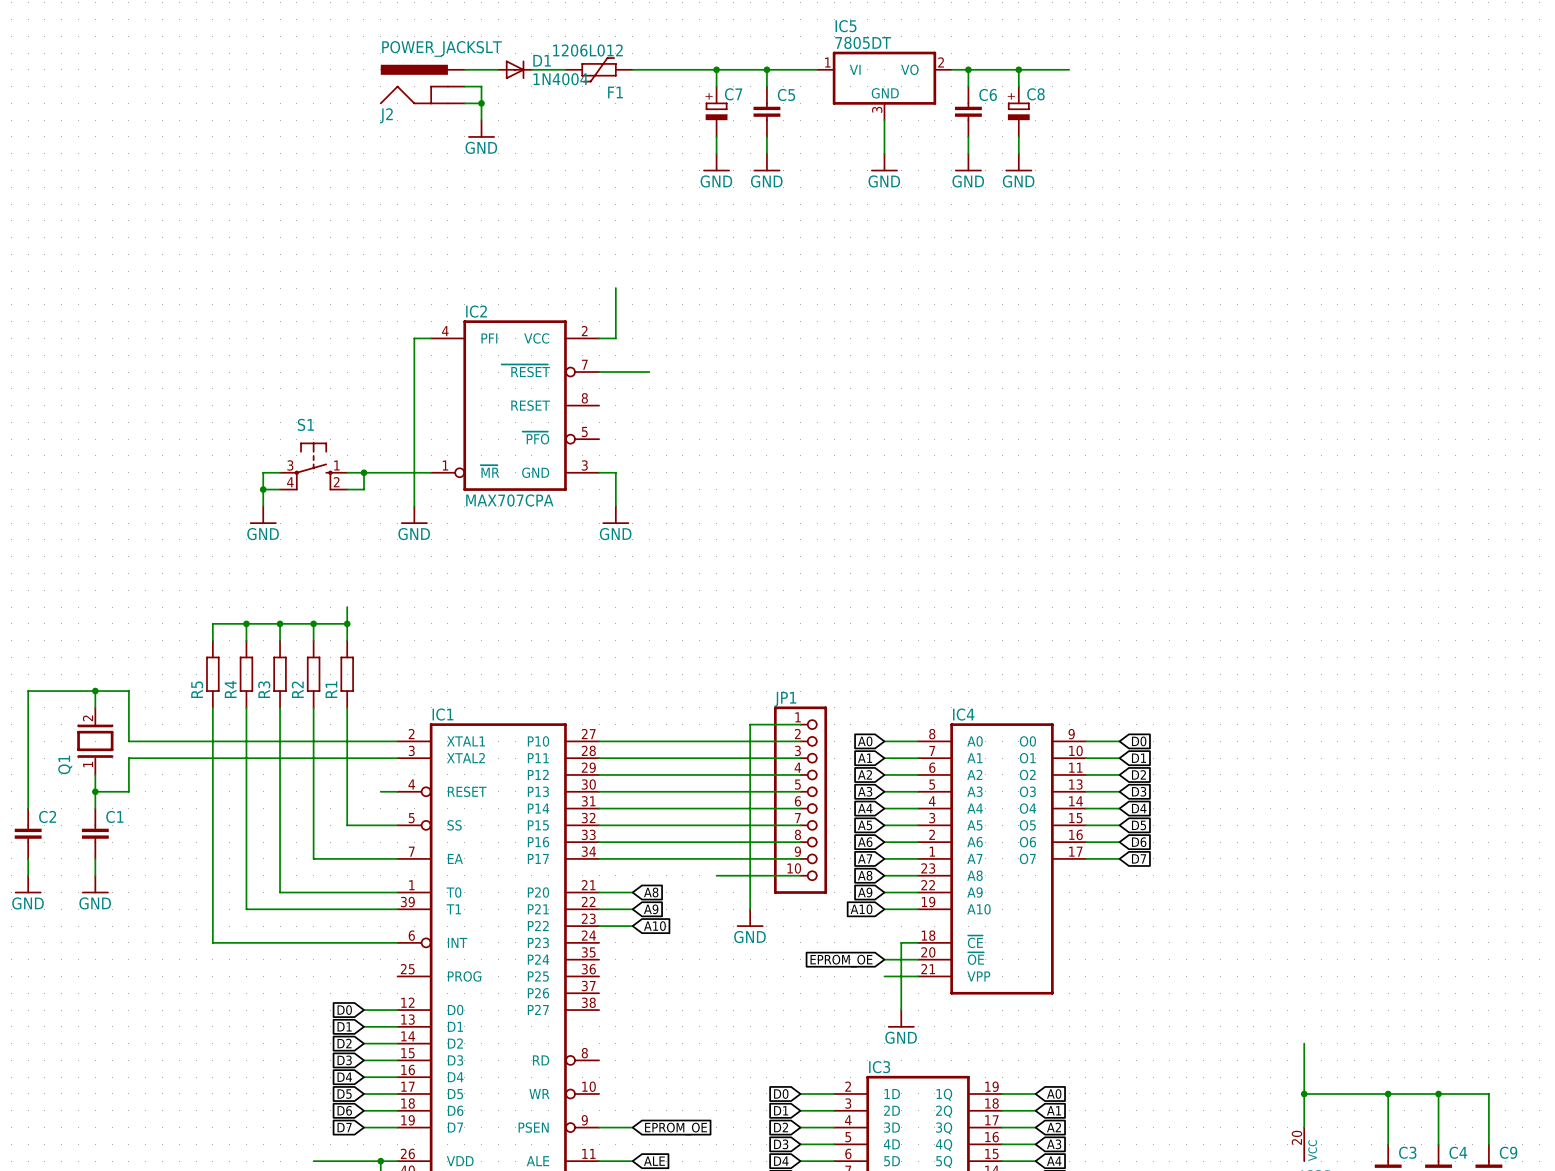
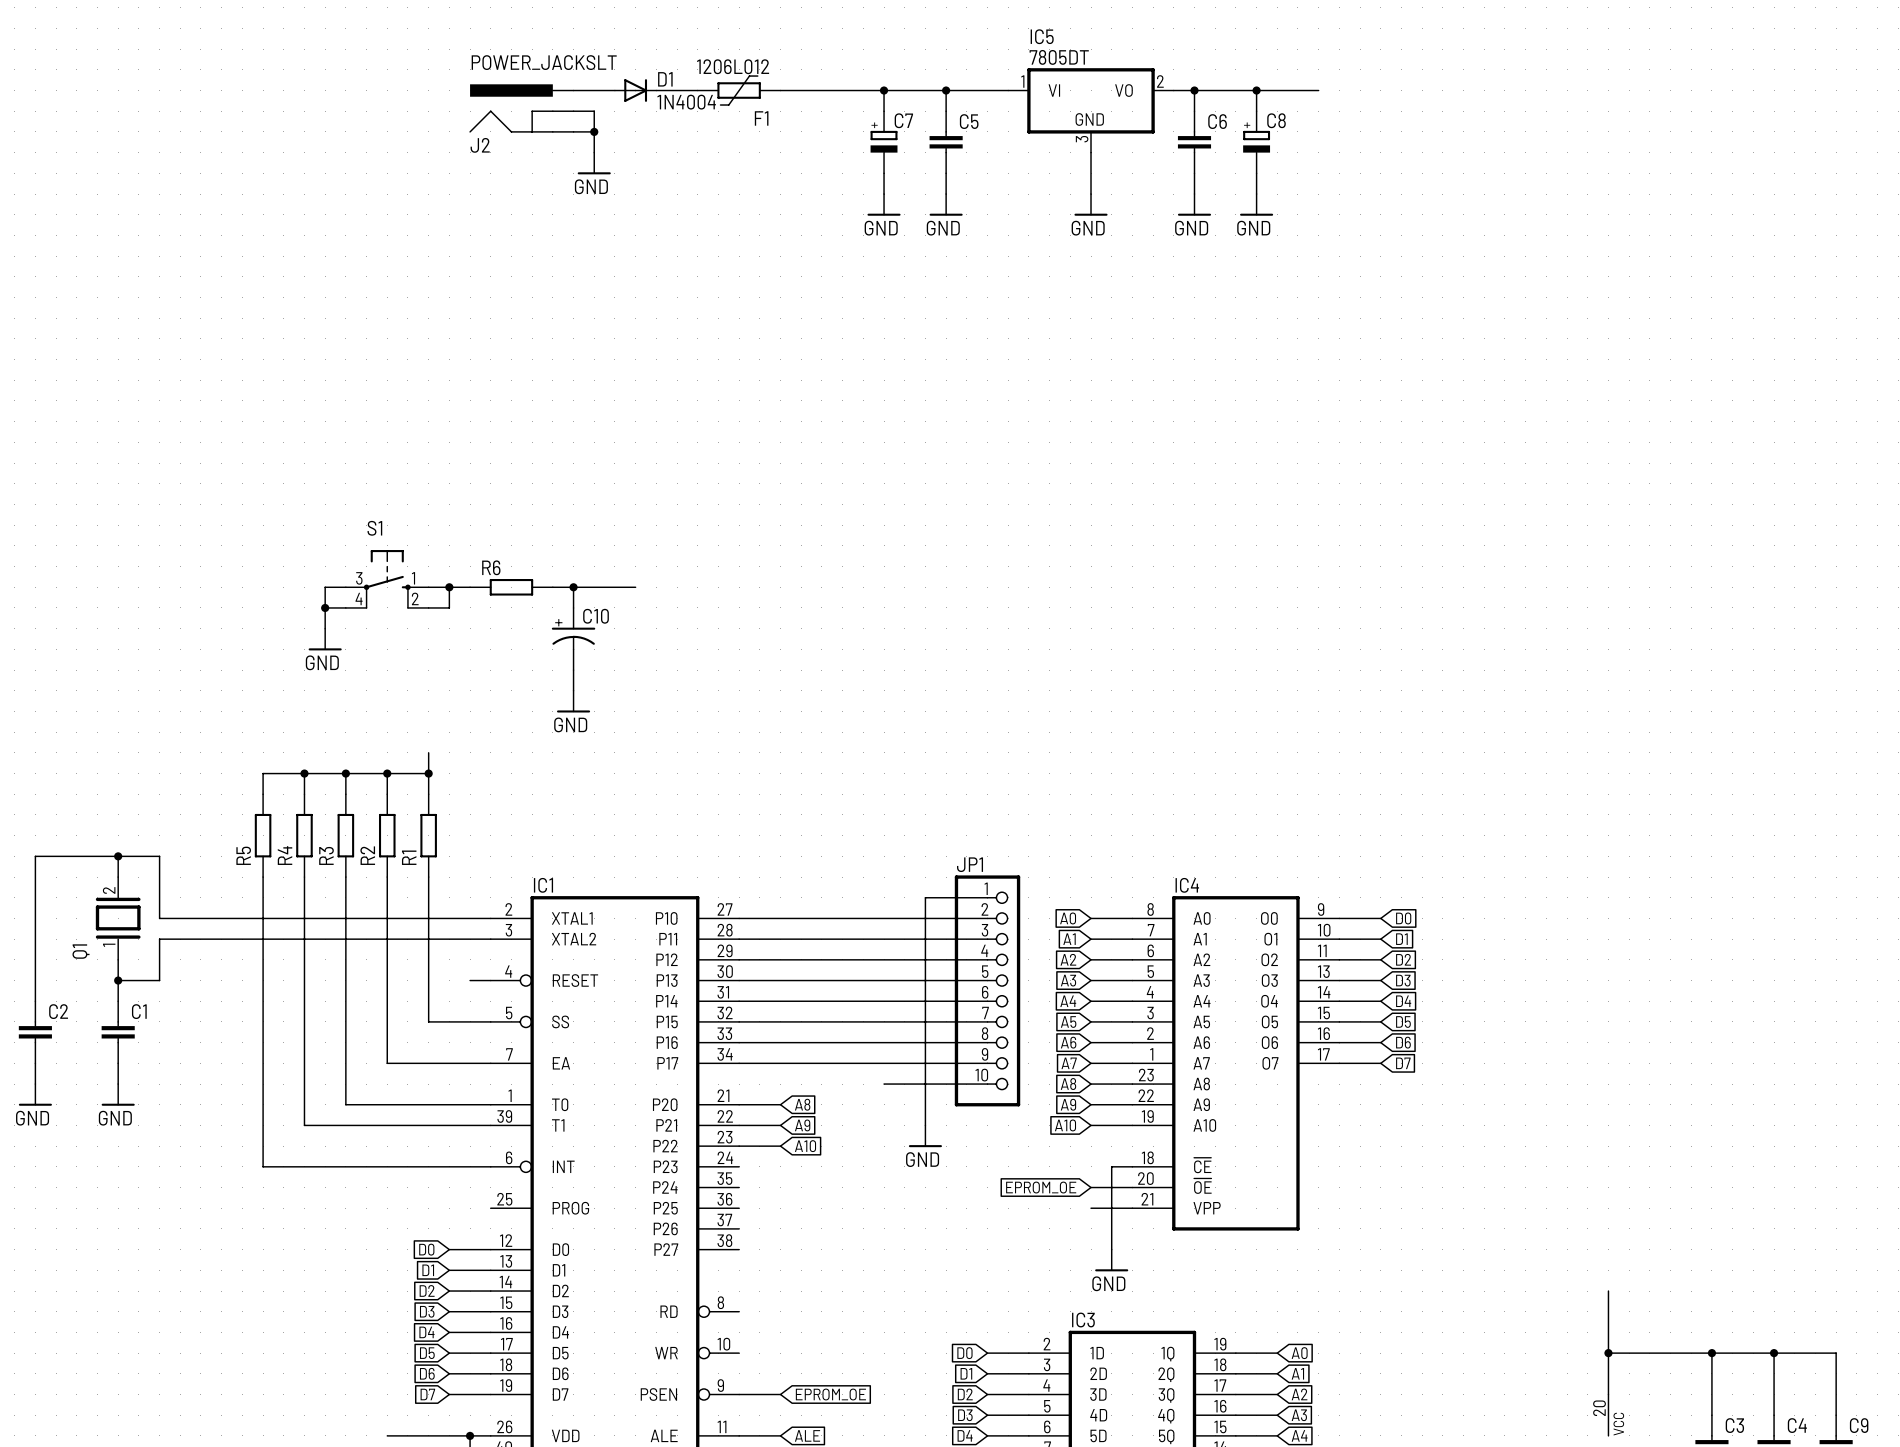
wire: (615, 288) (615, 338) (599, 338) -> none
wire: (431, 338) (414, 338) (414, 506) -> none
wire: (599, 372) (649, 372) -> none
IC2: MAX707CPA (515, 405) -> none
wire: (380, 472) (431, 472) -> none
R6: none -> (511, 587)
wire: none -> (552, 587) (635, 587)
junction: none -> (573, 587)
wire: (599, 472) (615, 472) (615, 506) -> none
C10: none -> (573, 639)
power symbol position: GND (414, 515) -> GND (573, 701)
power symbol: GND (615, 515) -> none
wire: none -> (573, 670) (573, 690)

